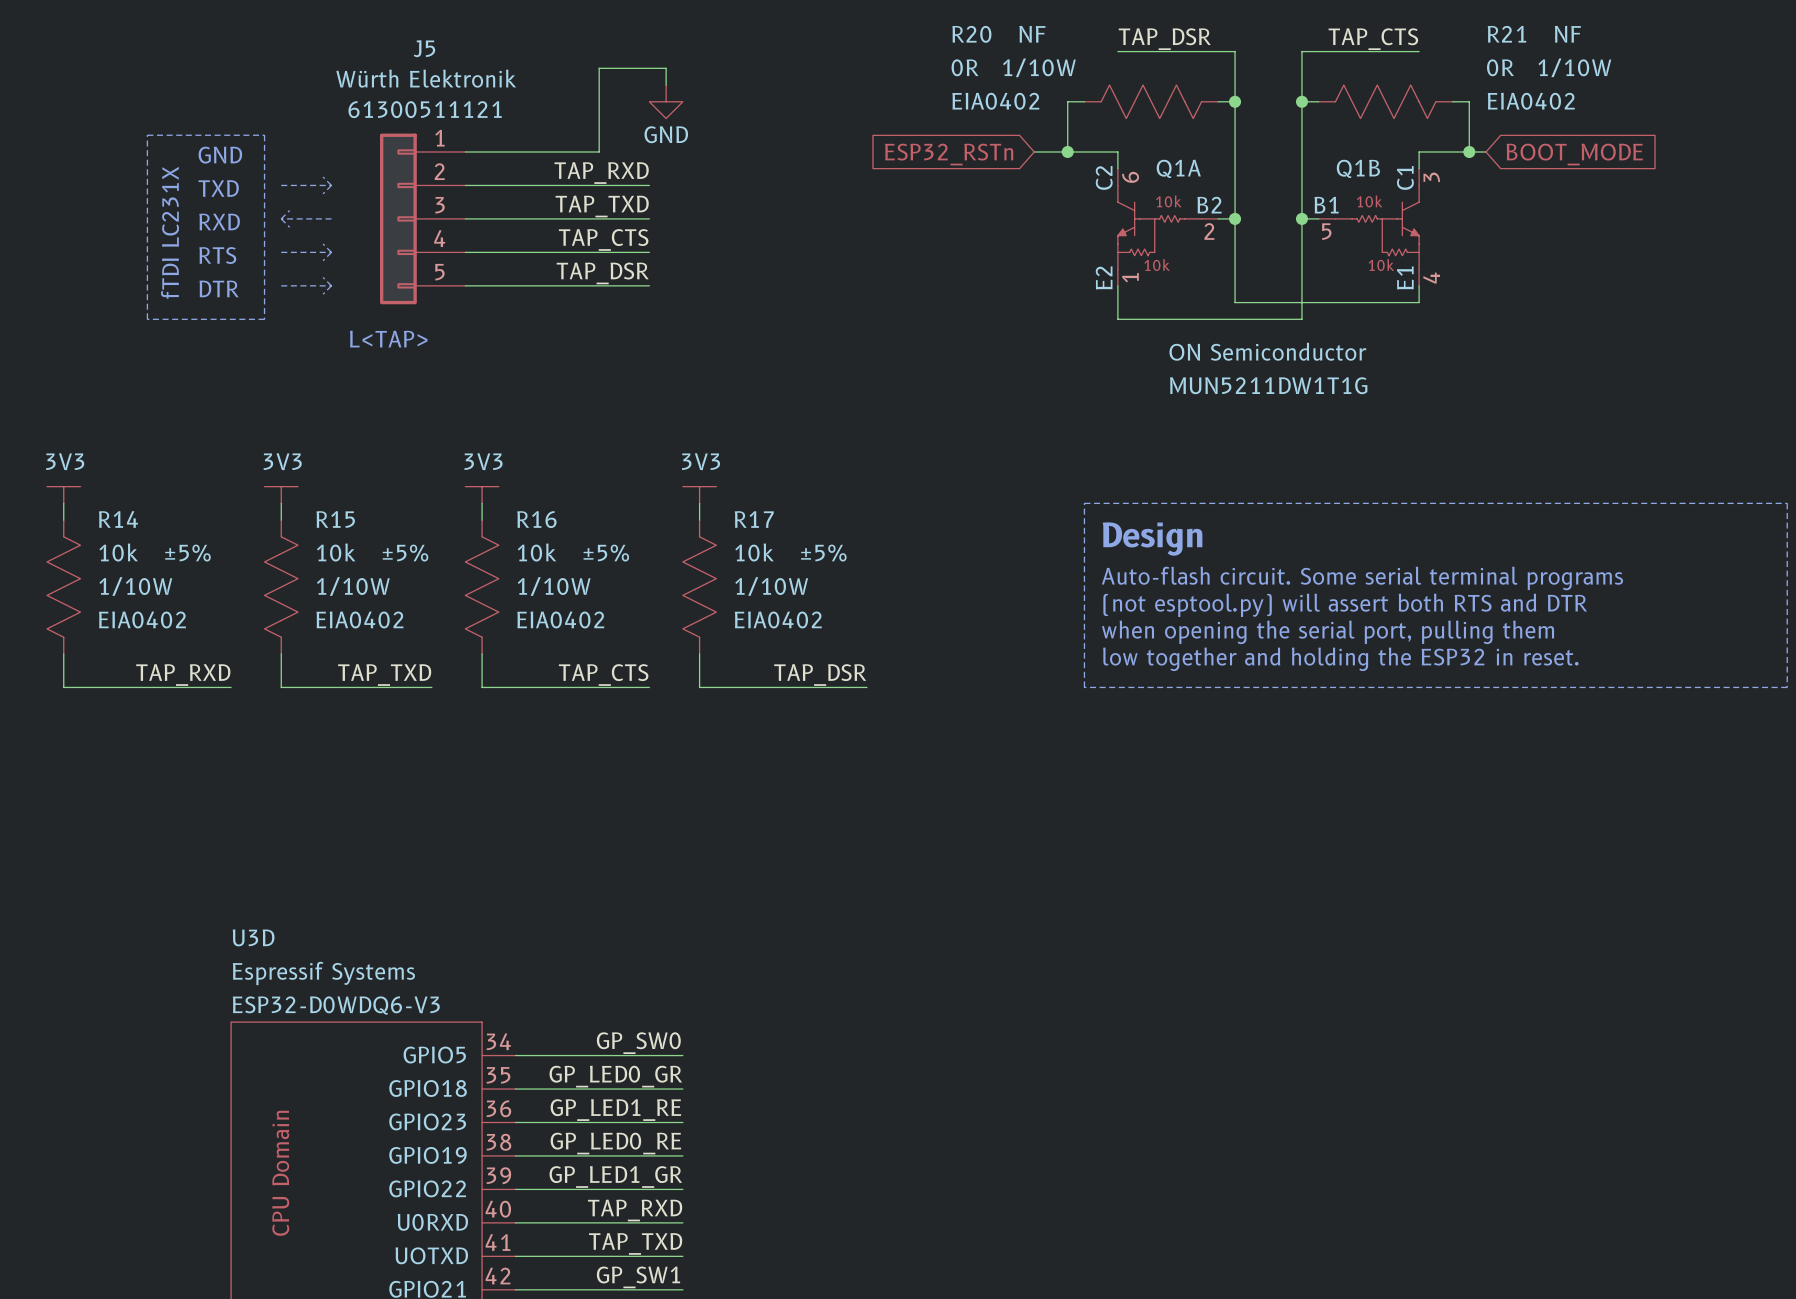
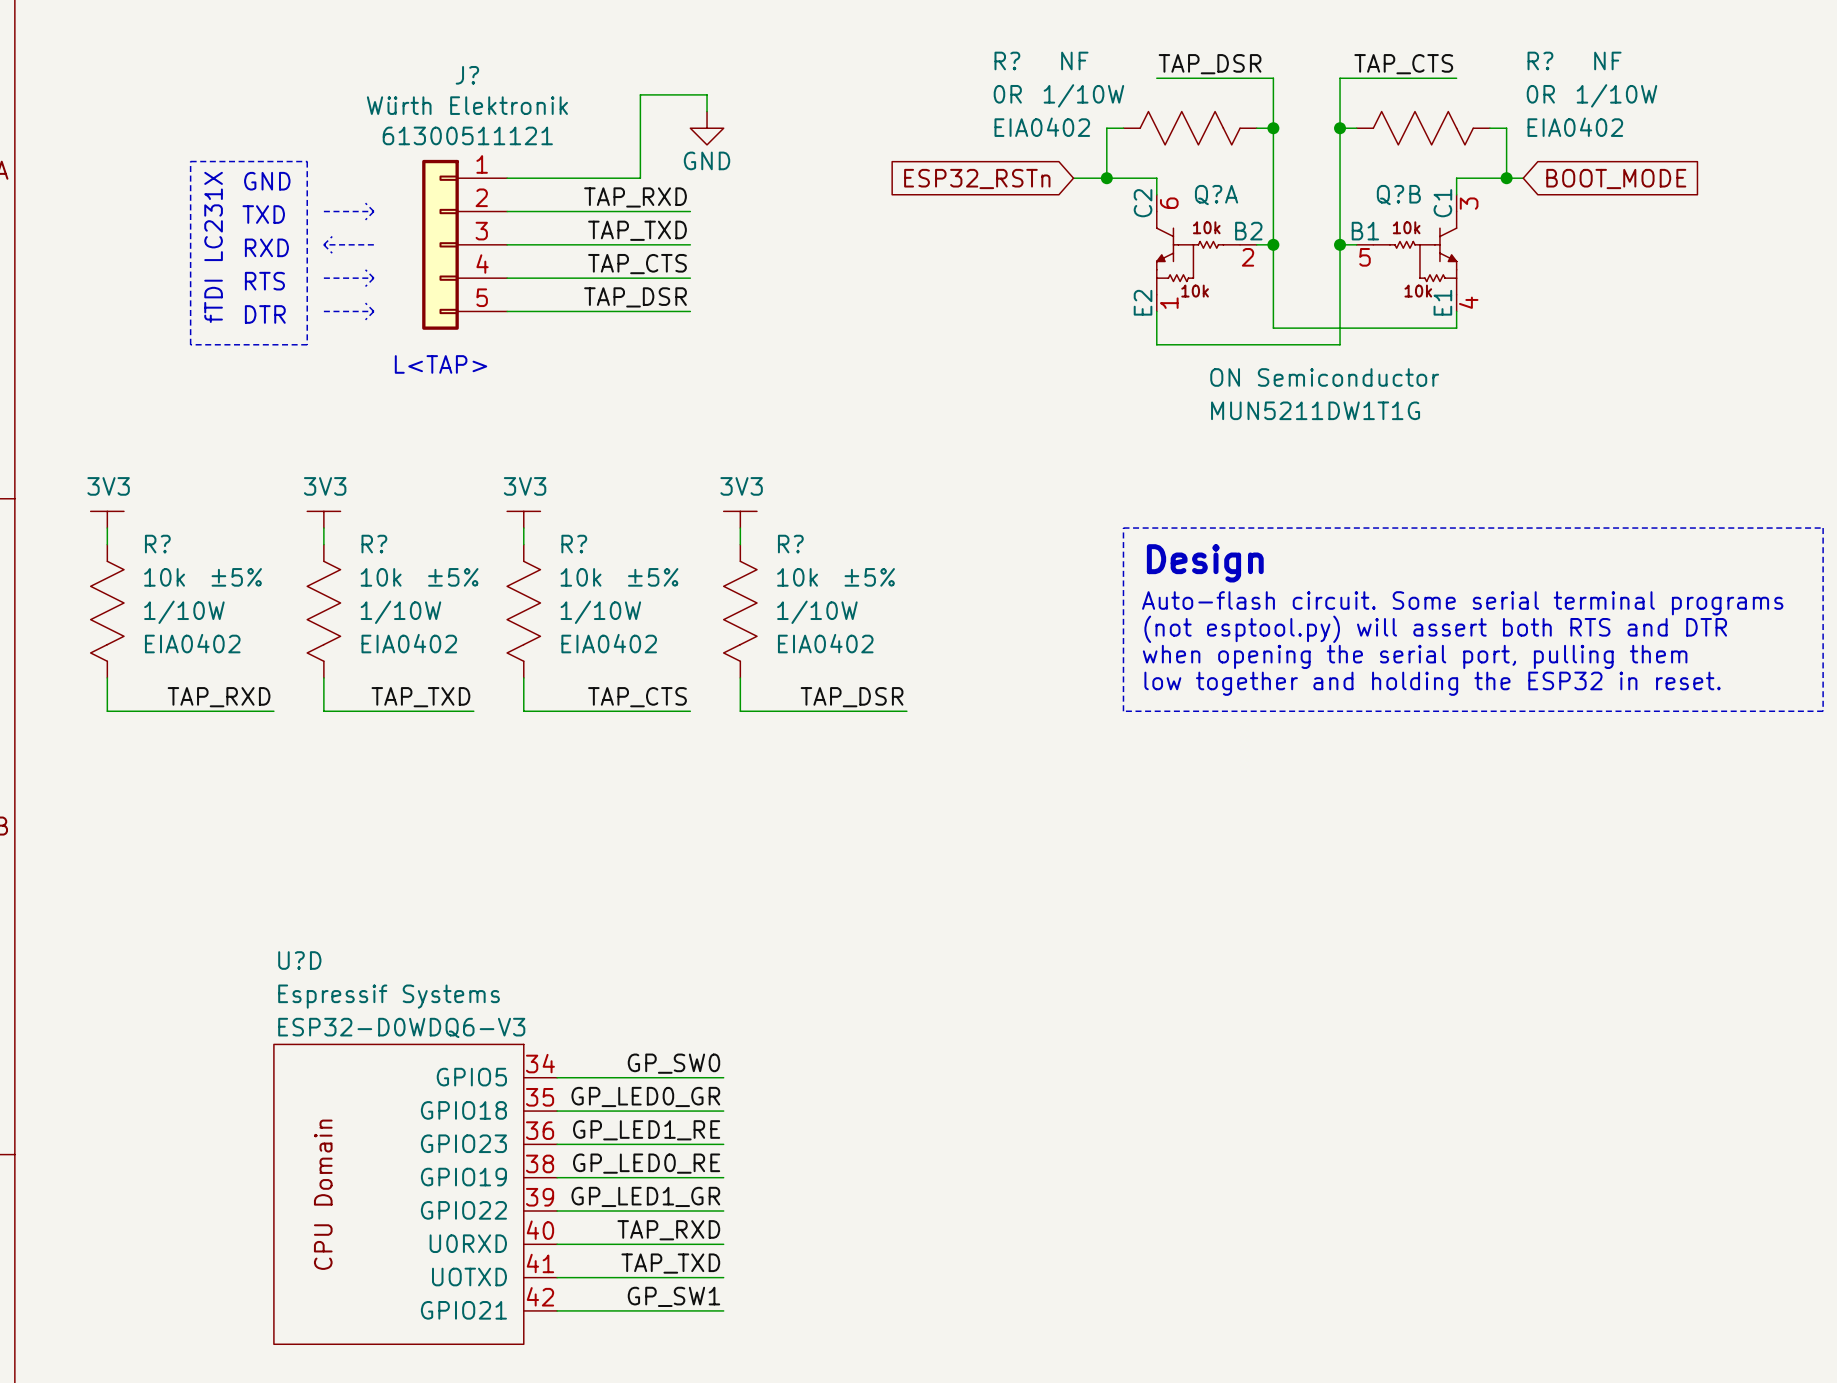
R20 name: R20 (971, 34) -> R? (1007, 60)
R21 name: R21 (1506, 34) -> R? (1540, 60)
J5 name: J5 (424, 48) -> J? (467, 75)
Q1A name: Q1A (1178, 168) -> Q?A (1216, 195)
Q1B name: Q1B (1358, 168) -> Q?B (1398, 195)
R14 name: R14 (118, 519) -> R? (157, 544)
R15 name: R15 (335, 519) -> R? (374, 544)
R16 name: R16 (536, 519) -> R? (574, 544)
R17 name: R17 (754, 519) -> R? (790, 544)
U3D name: U3D (253, 937) -> U?D (299, 960)

